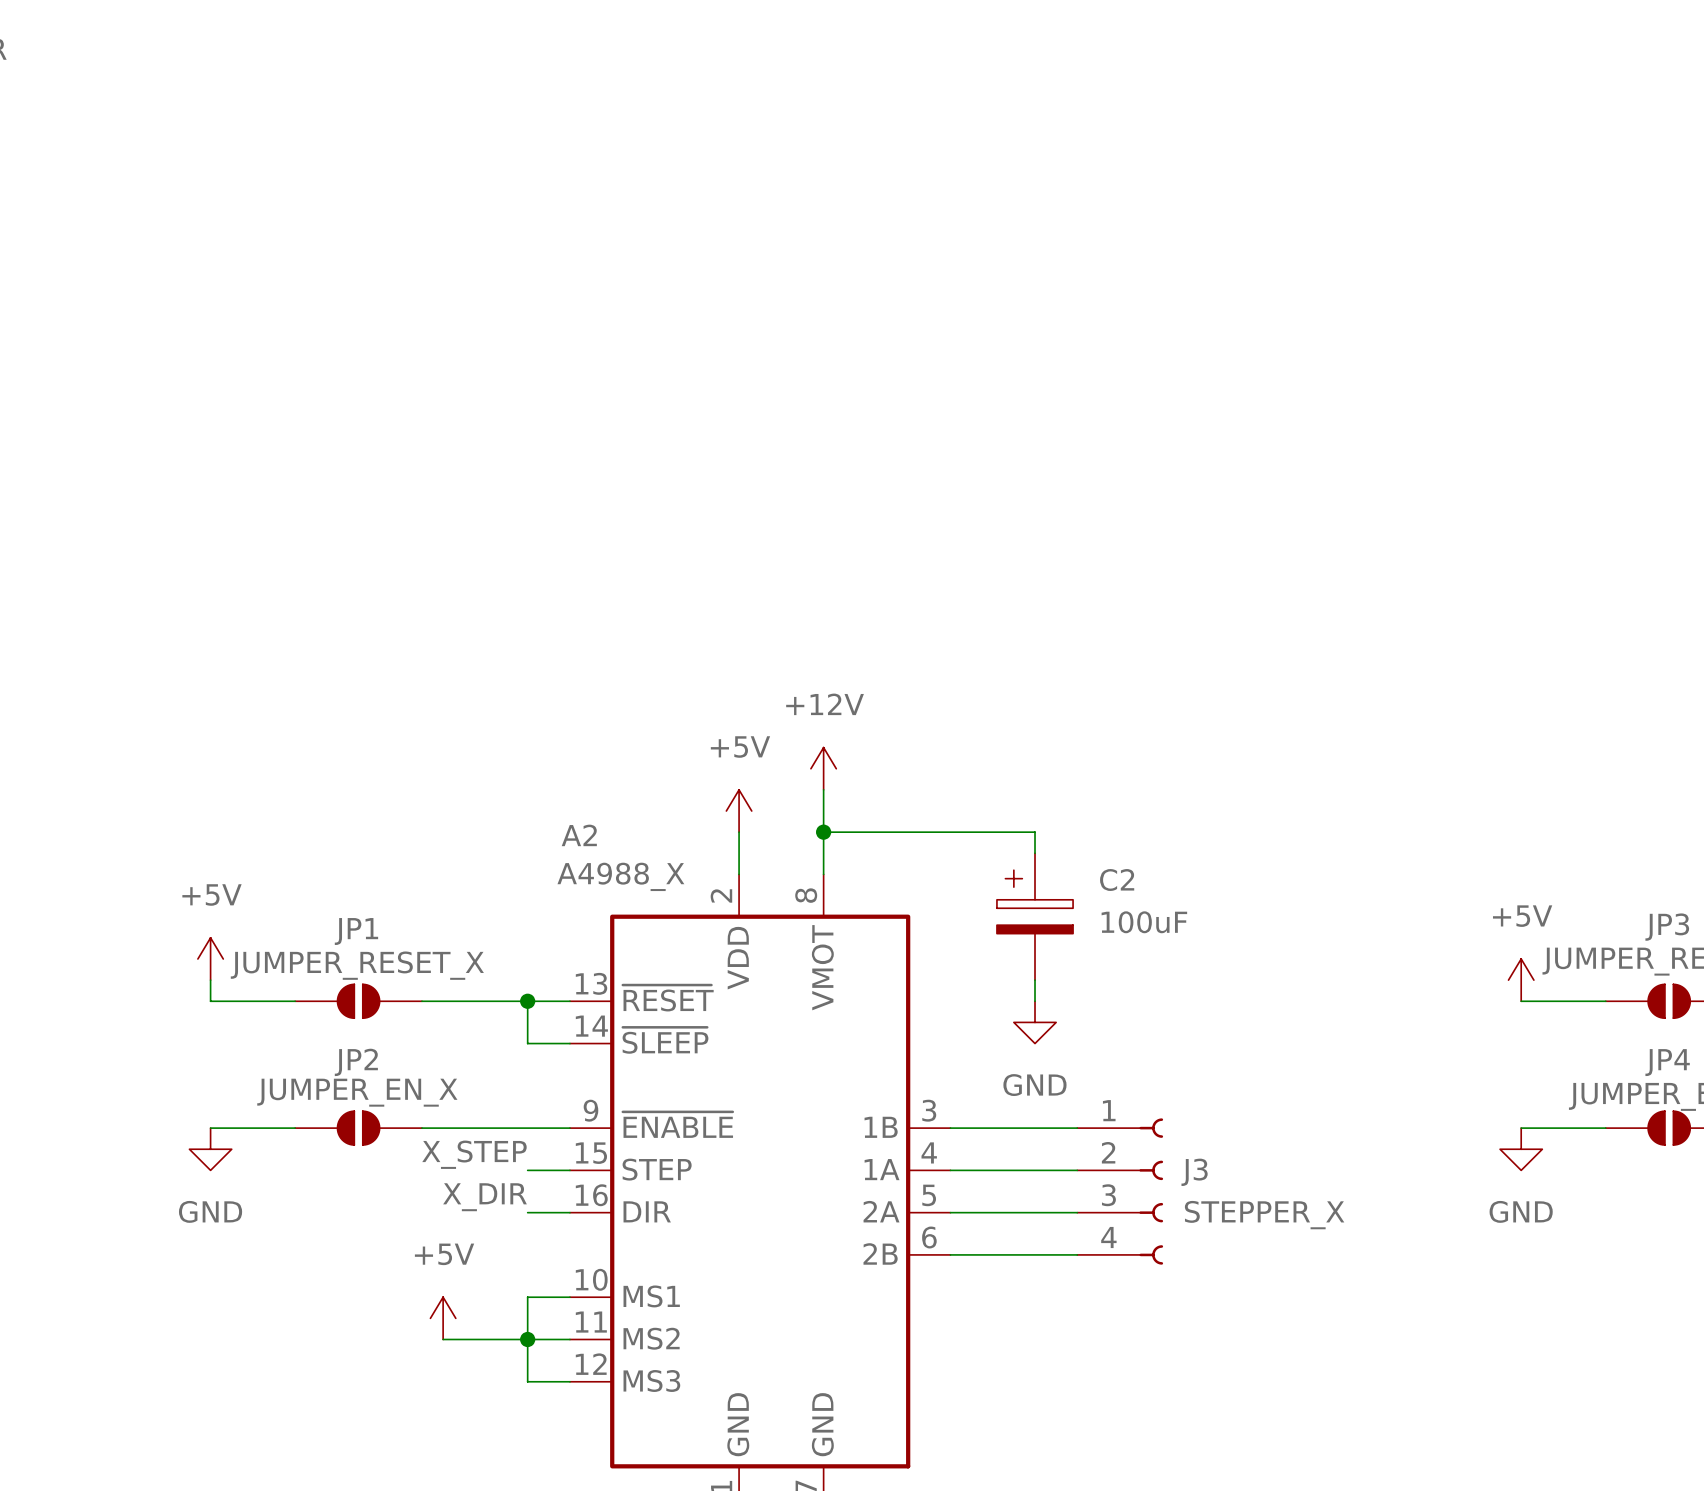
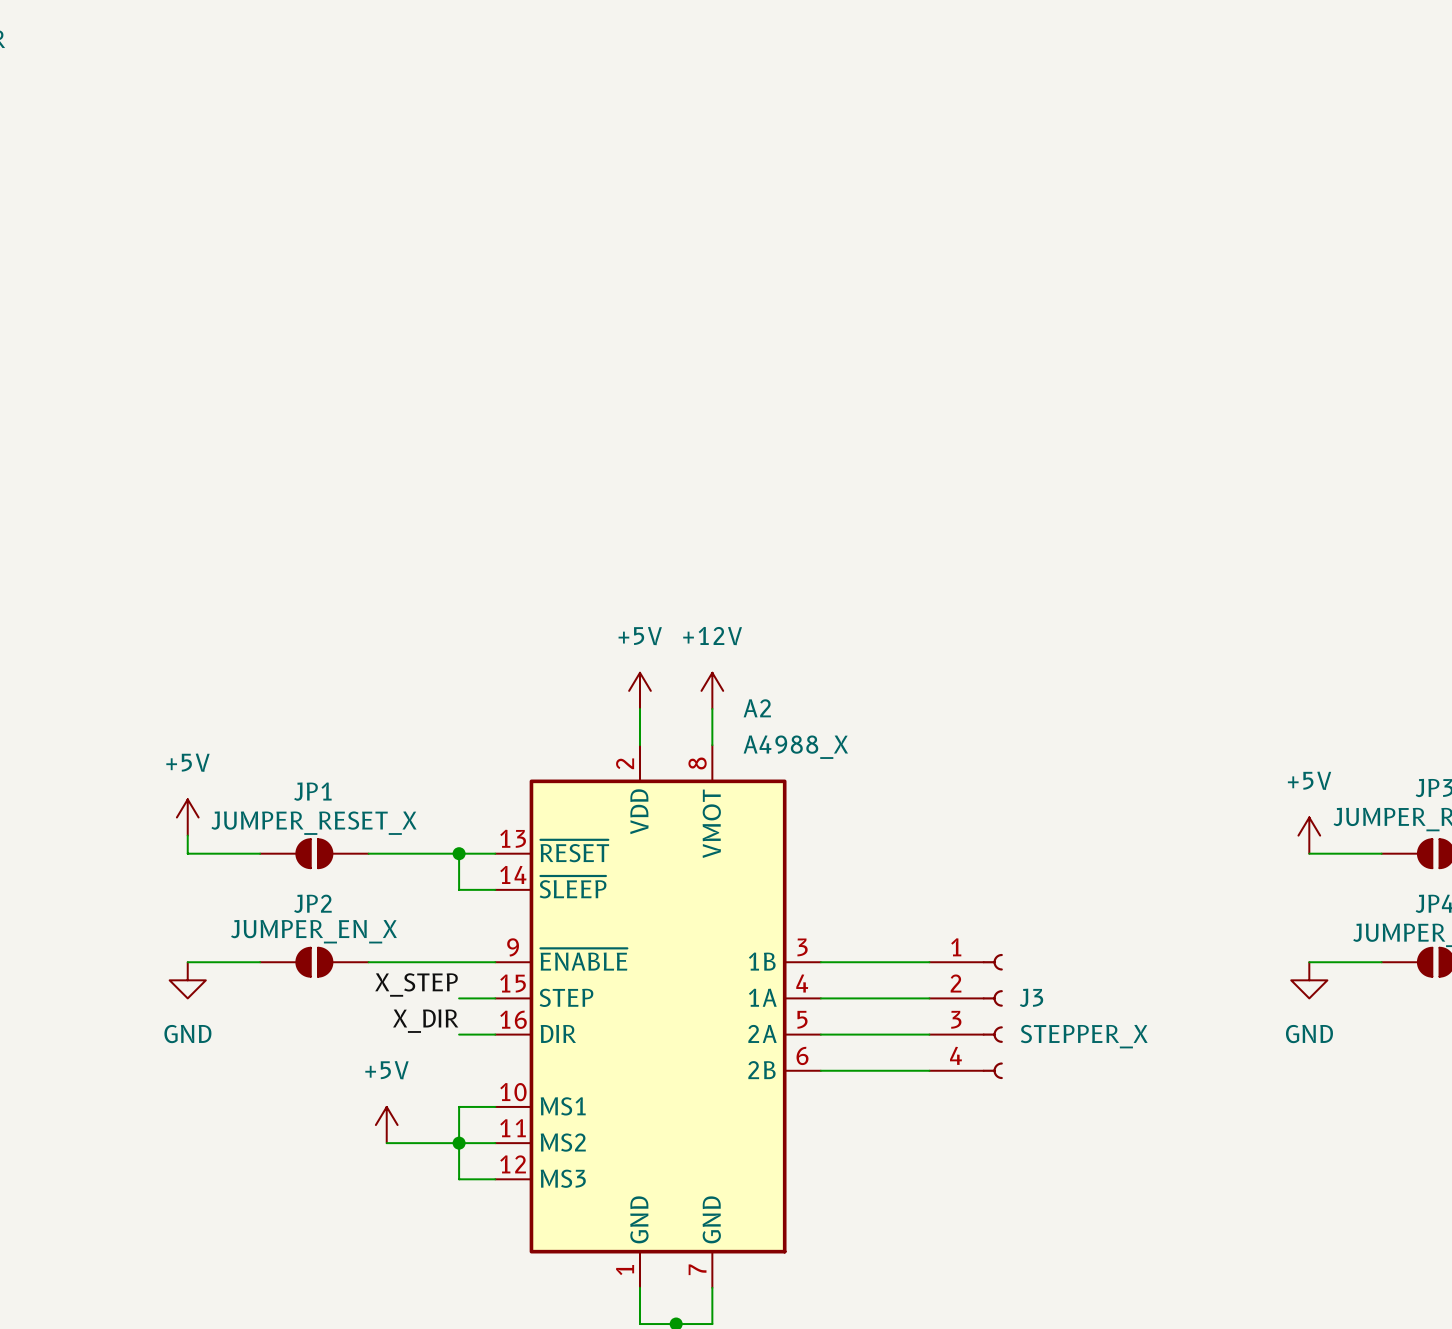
power symbol position: +12V (823, 768) -> +12V (712, 690)
wire: (823, 789) (823, 832) (1035, 832) (1035, 853) -> none
junction: (823, 832) -> none
A2 name position: A2 (579, 835) -> A2 (757, 708)
A2 value position: A4988_X (620, 876) -> A4988_X (795, 747)
C2: 100uF (1035, 916) -> none
wire: (1035, 980) (1035, 1001) -> none
power symbol: GND (1035, 1022) -> none

